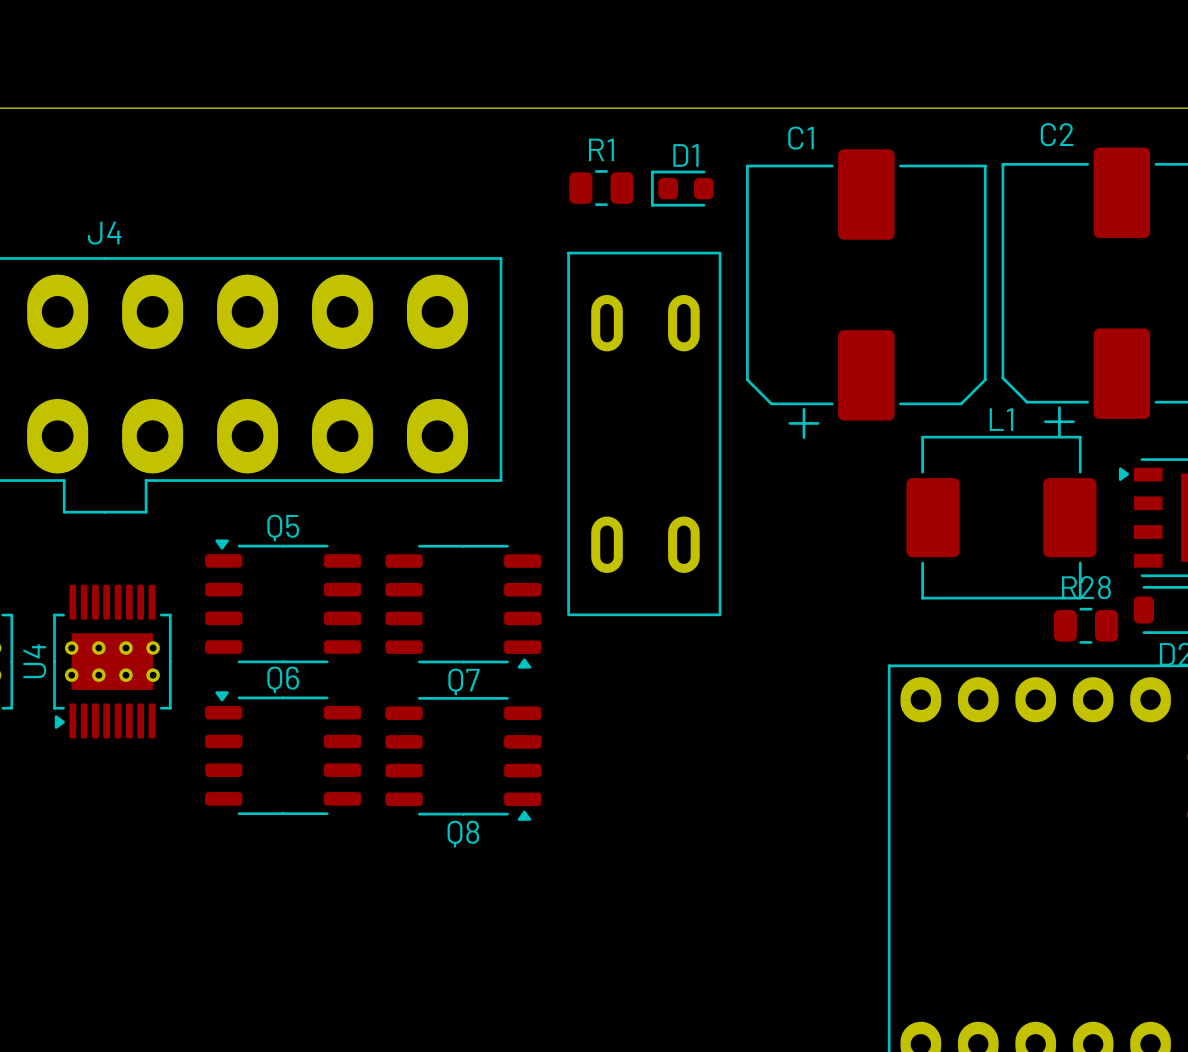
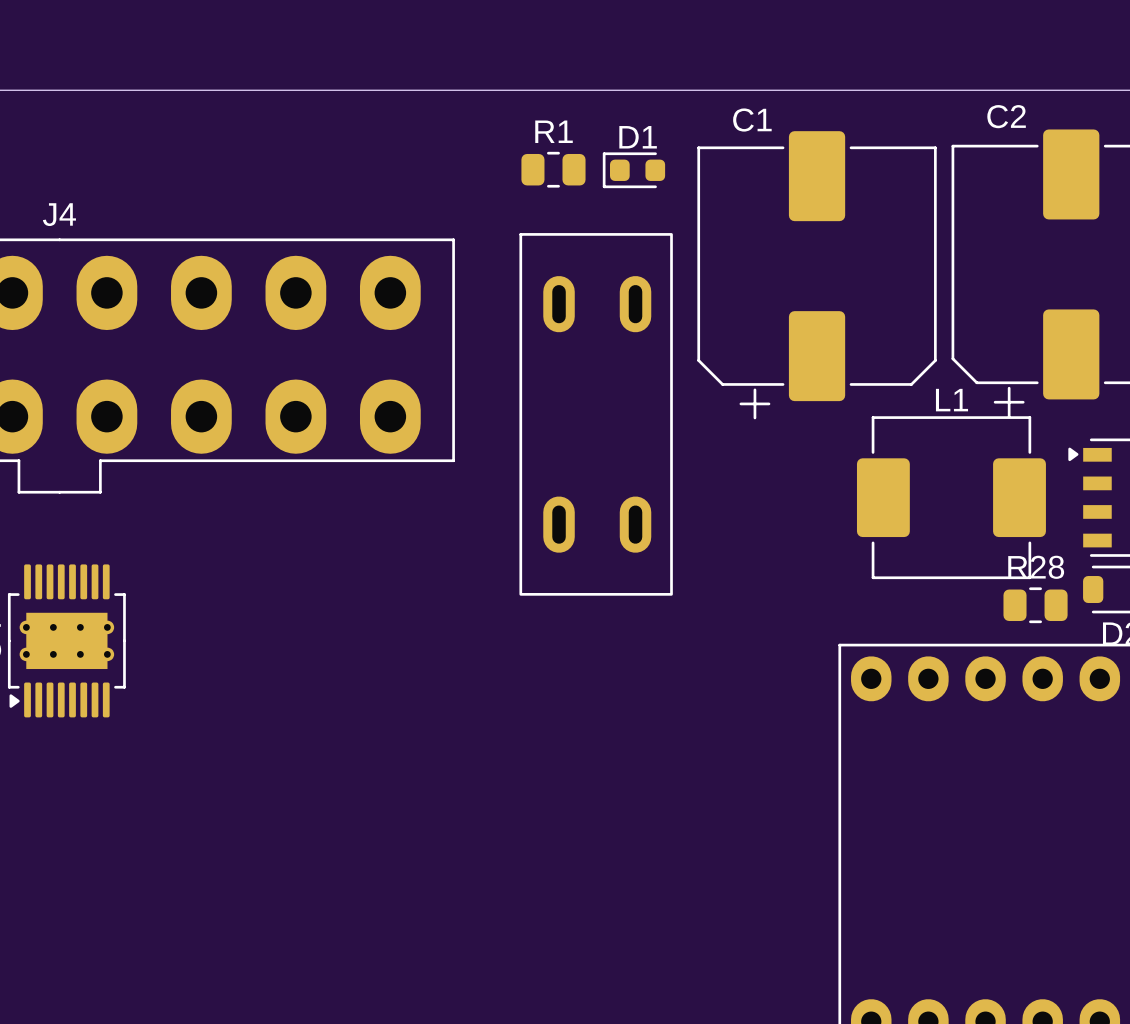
Q5: (283, 601) -> none
Q7: (463, 606) -> none
Q6: (283, 753) -> none
Q8: (463, 758) -> none

